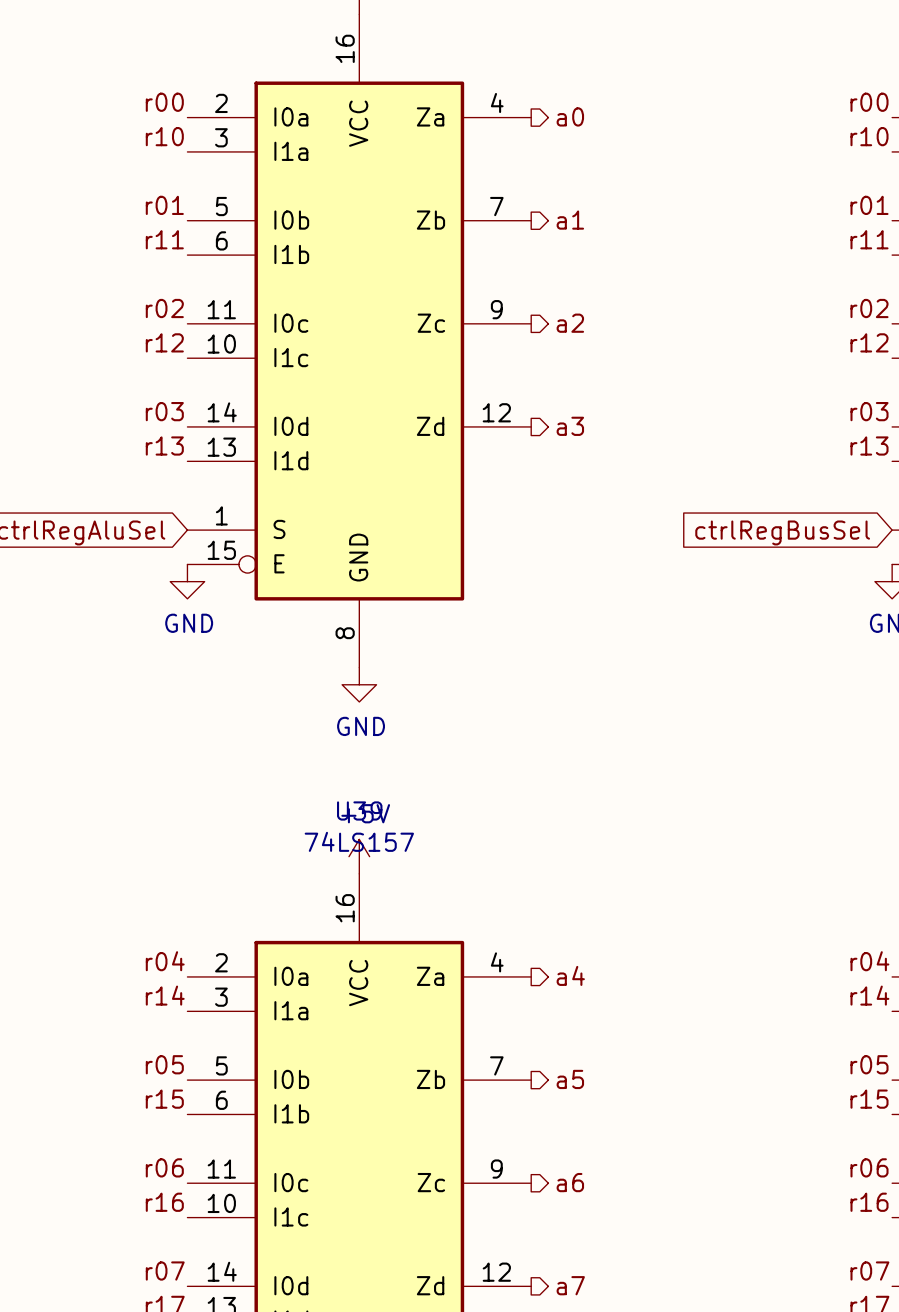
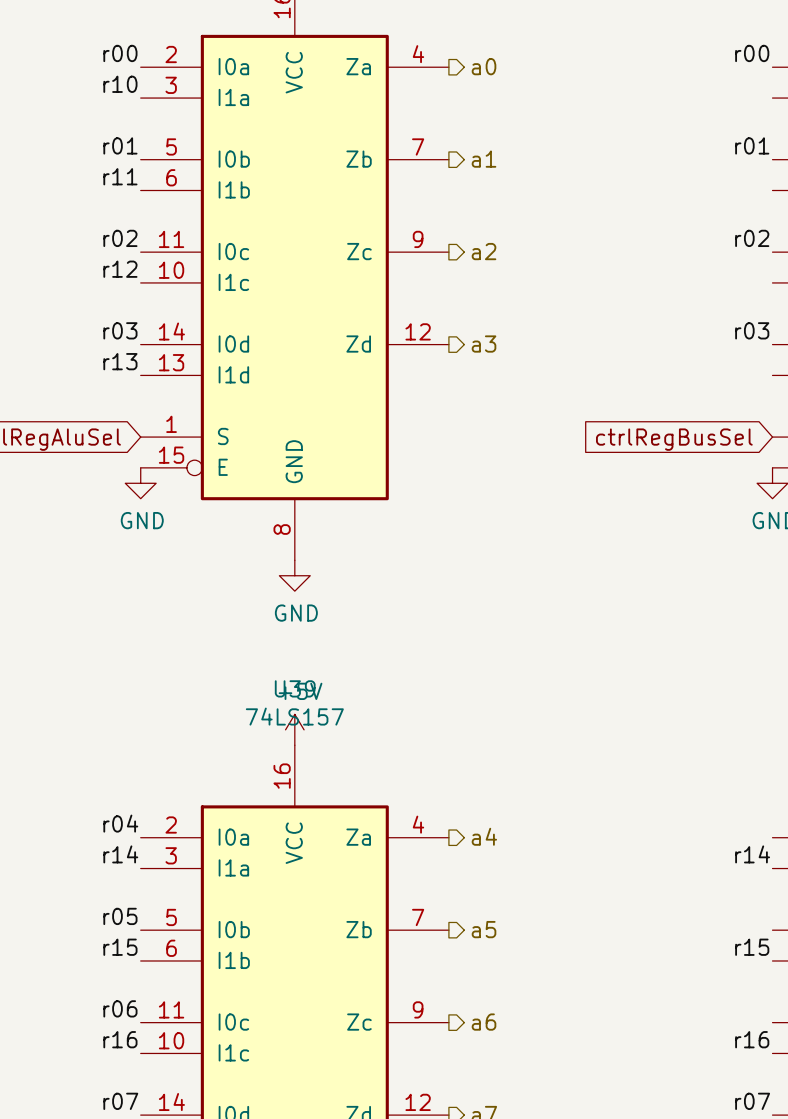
label: r10 (869, 136) -> none
label: r11 (869, 239) -> none
label: r12 (869, 342) -> none
label: r13 (869, 446) -> none
label: r04 (869, 961) -> none
label: r05 (869, 1064) -> none
label: r06 (869, 1167) -> none

